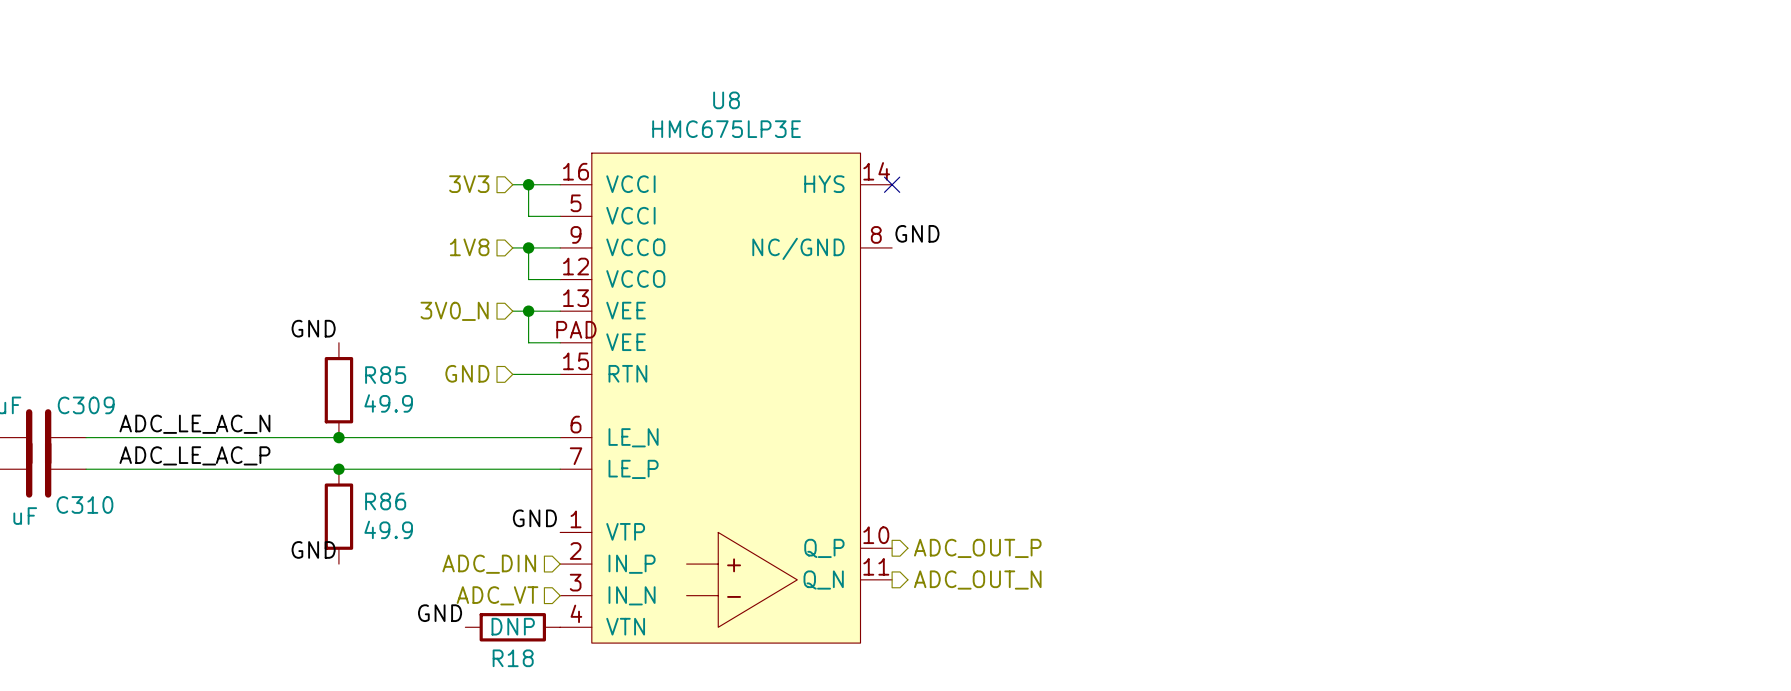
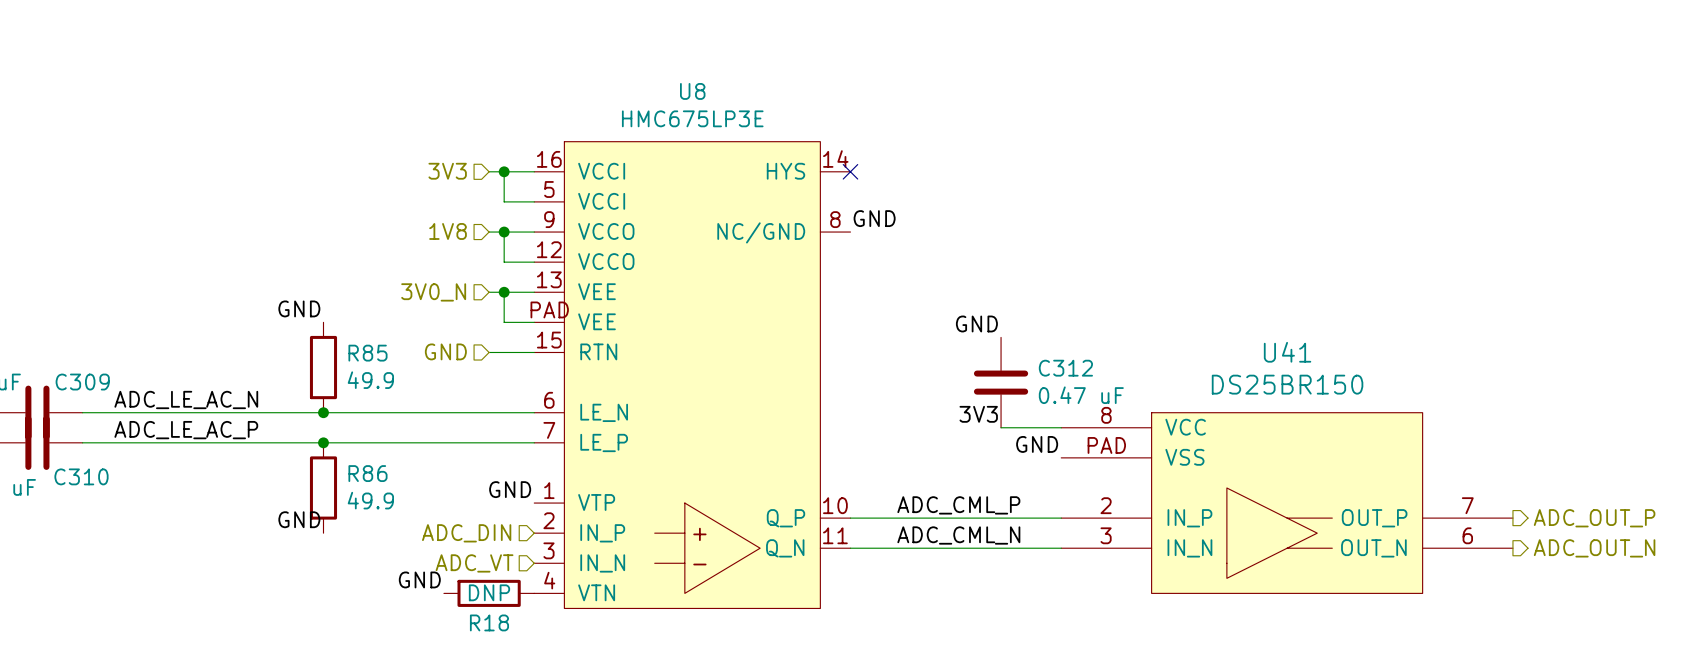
label: none -> GND (976, 323)
C312: none -> 0.47 uF (1001, 382)
label: none -> 3V3 (978, 414)
wire: none -> (1001, 427) (1061, 427)
label: none -> GND (1037, 444)
U41: none -> DS25BR150 (1287, 503)
label: none -> ADC_CML_P (958, 505)
wire: none -> (850, 518) (1061, 518)
hierarchical label: ADC_OUT_P (977, 548) -> none
hierarchical label: none -> ADC_OUT_P (1594, 518)
label: none -> ADC_CML_N (958, 535)
wire: none -> (850, 548) (1061, 548)
hierarchical label: ADC_OUT_N (977, 580) -> none
hierarchical label: none -> ADC_OUT_N (1594, 548)

